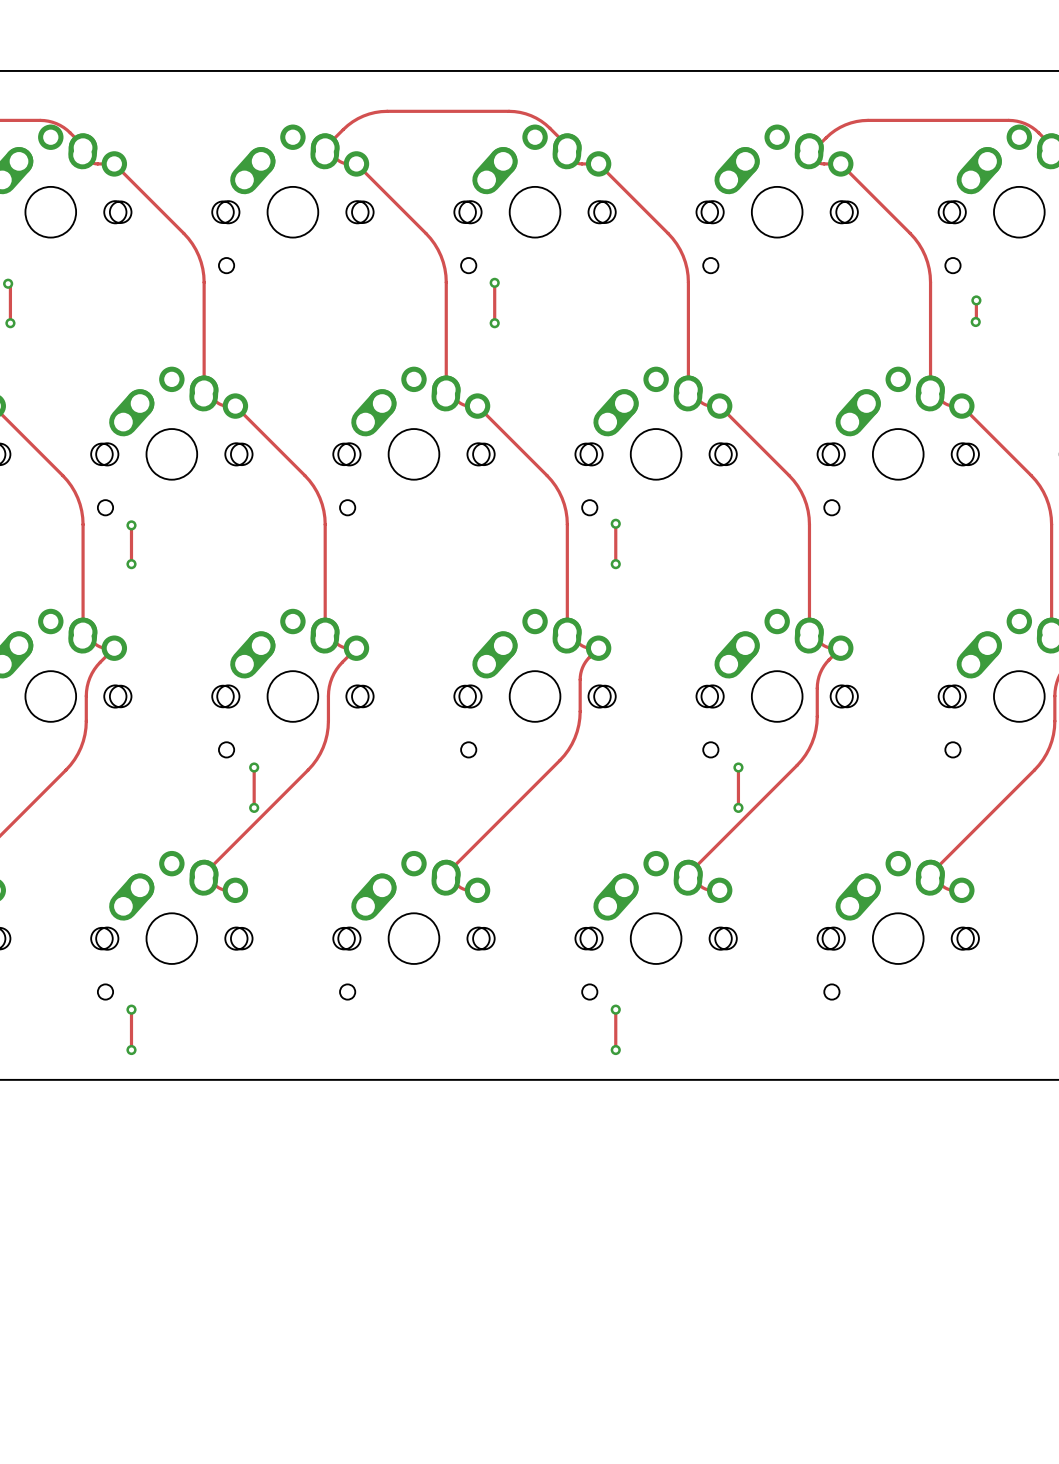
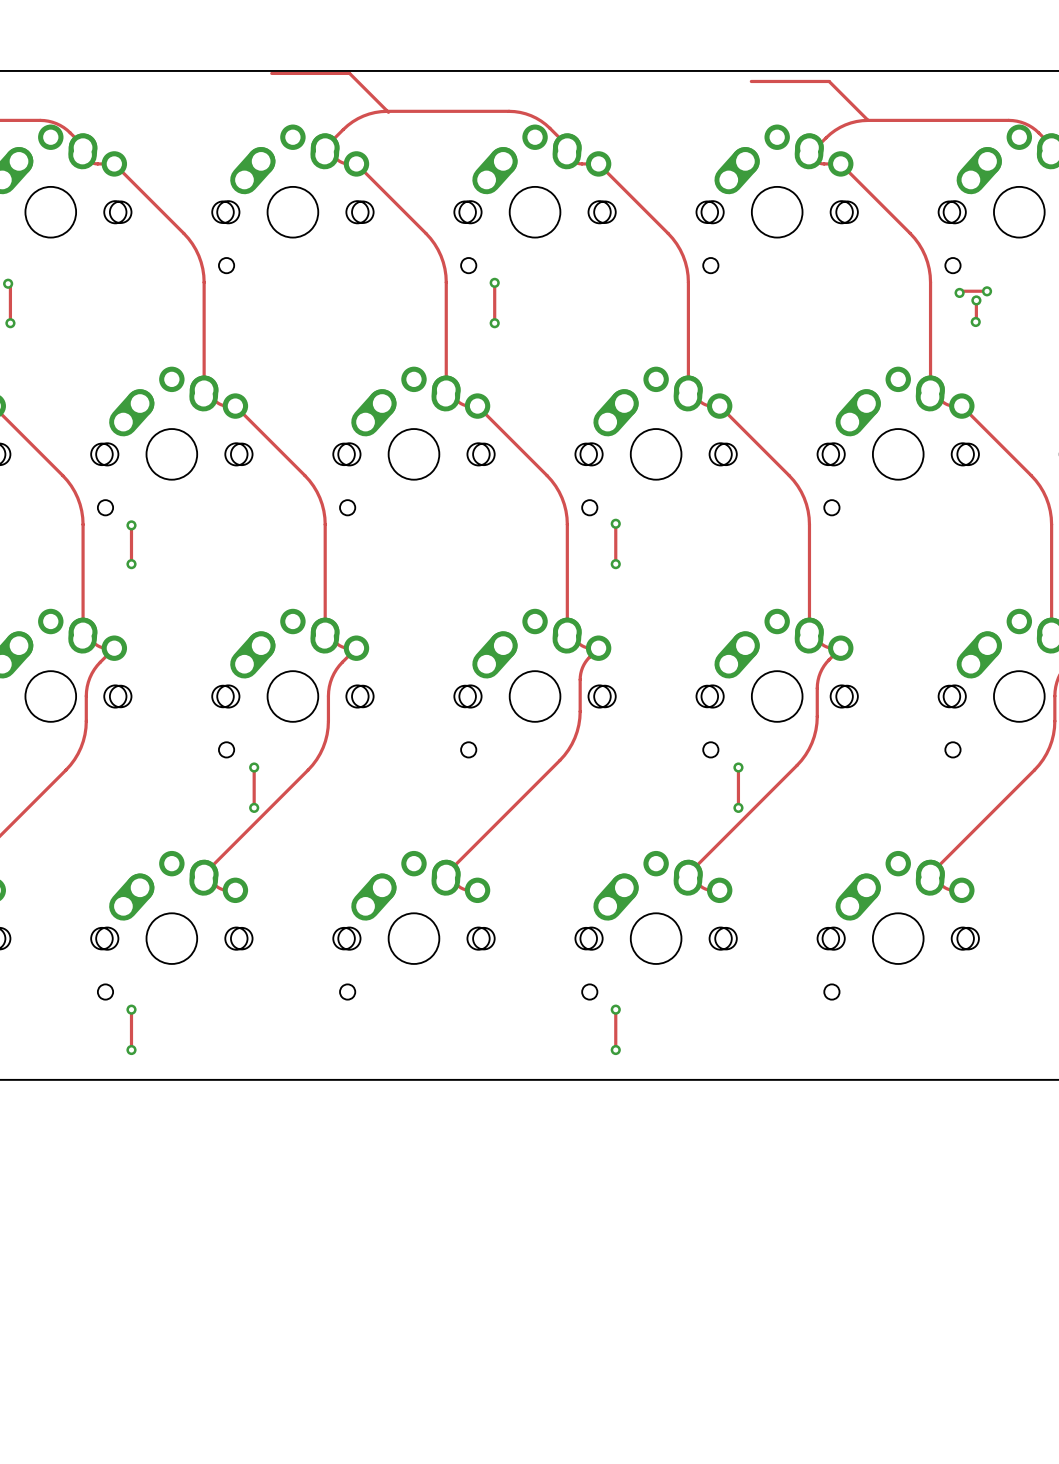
track: none -> (271, 73) (349, 73) (388, 112)
track: none -> (751, 81) (829, 81) (868, 120)
track: none -> (986, 291) (961, 291) (959, 292)
via: none -> (987, 291)
via: none -> (959, 292)

